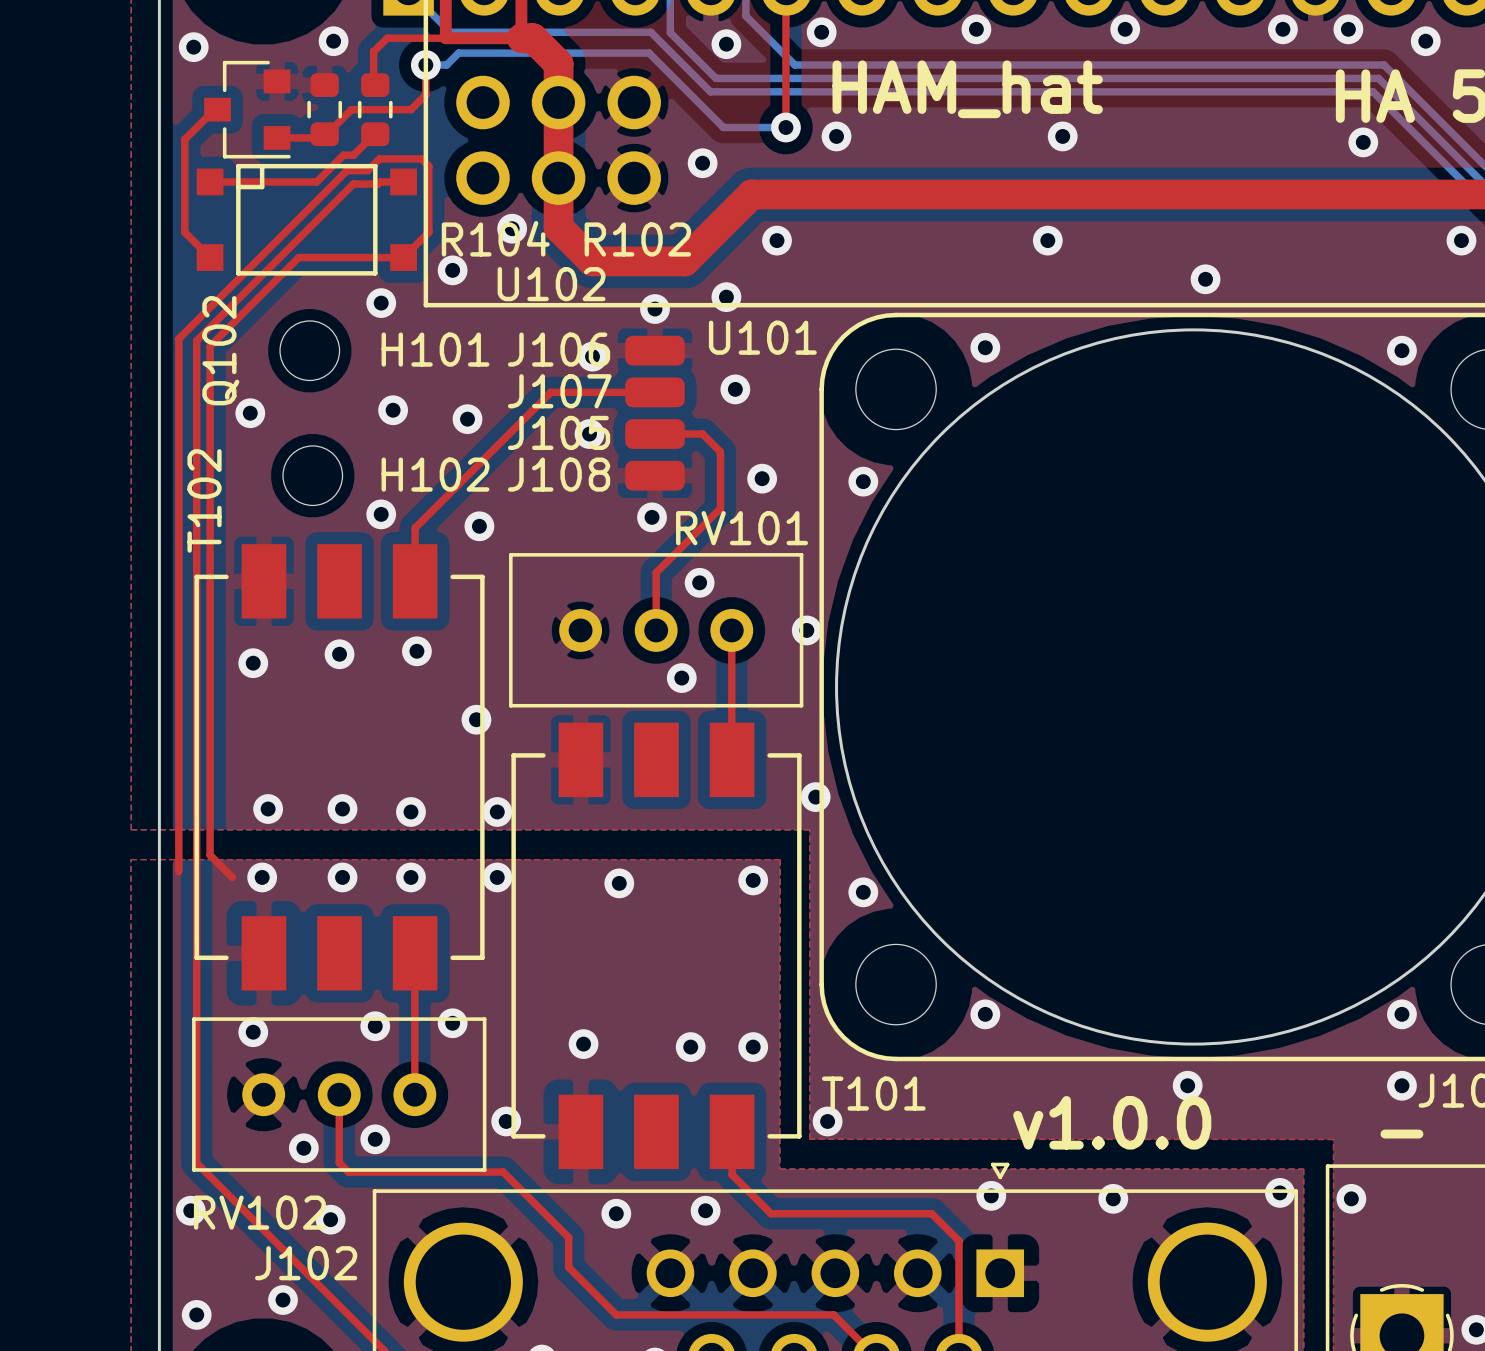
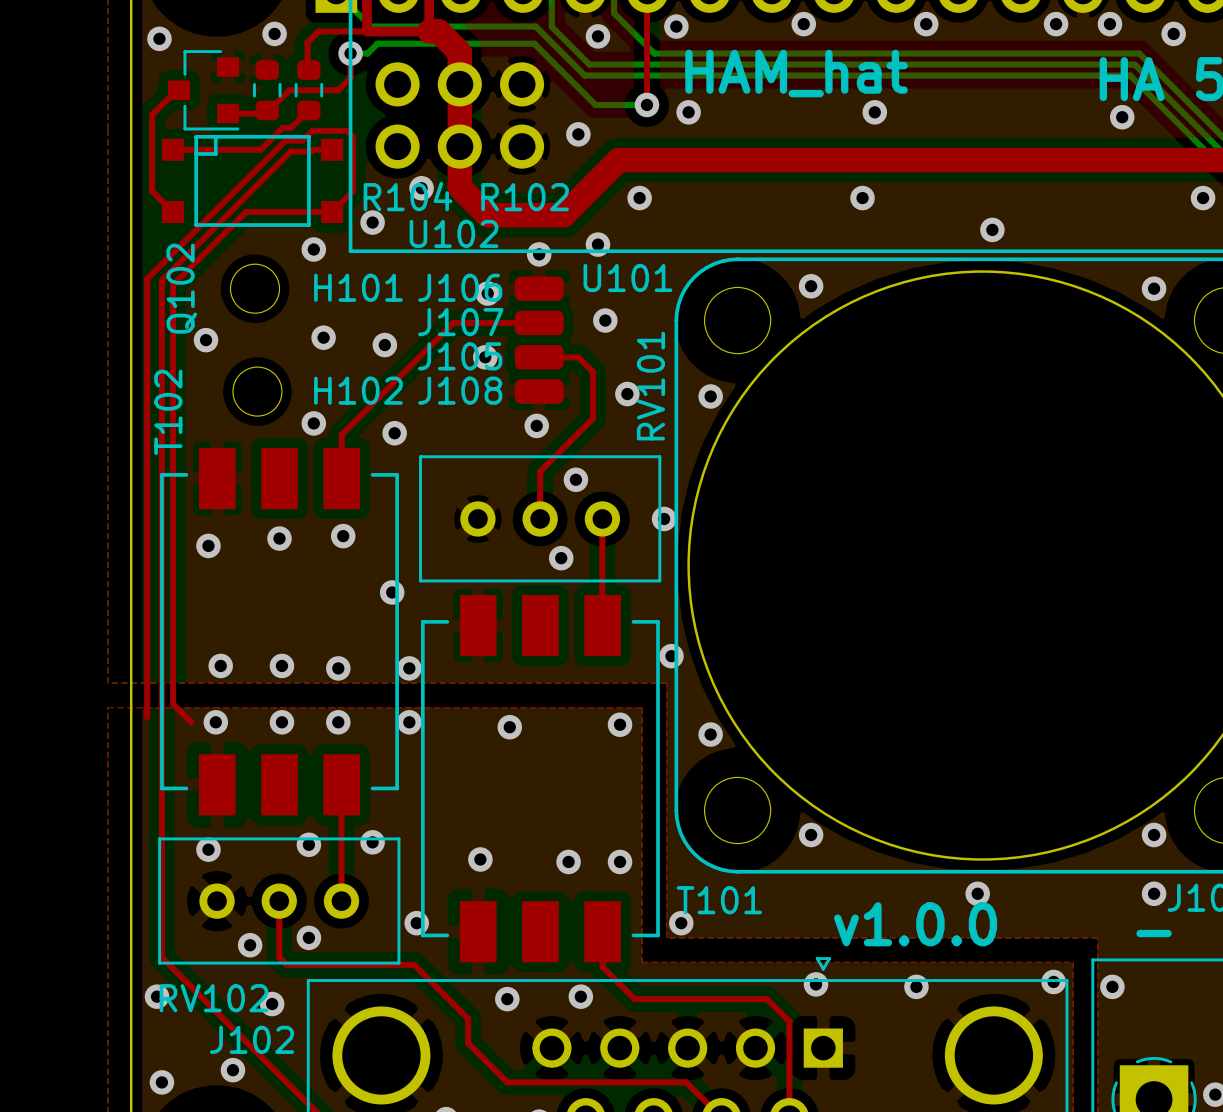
RV101 name rotation: 0° (742, 528) -> 90° counterclockwise (650, 386)

